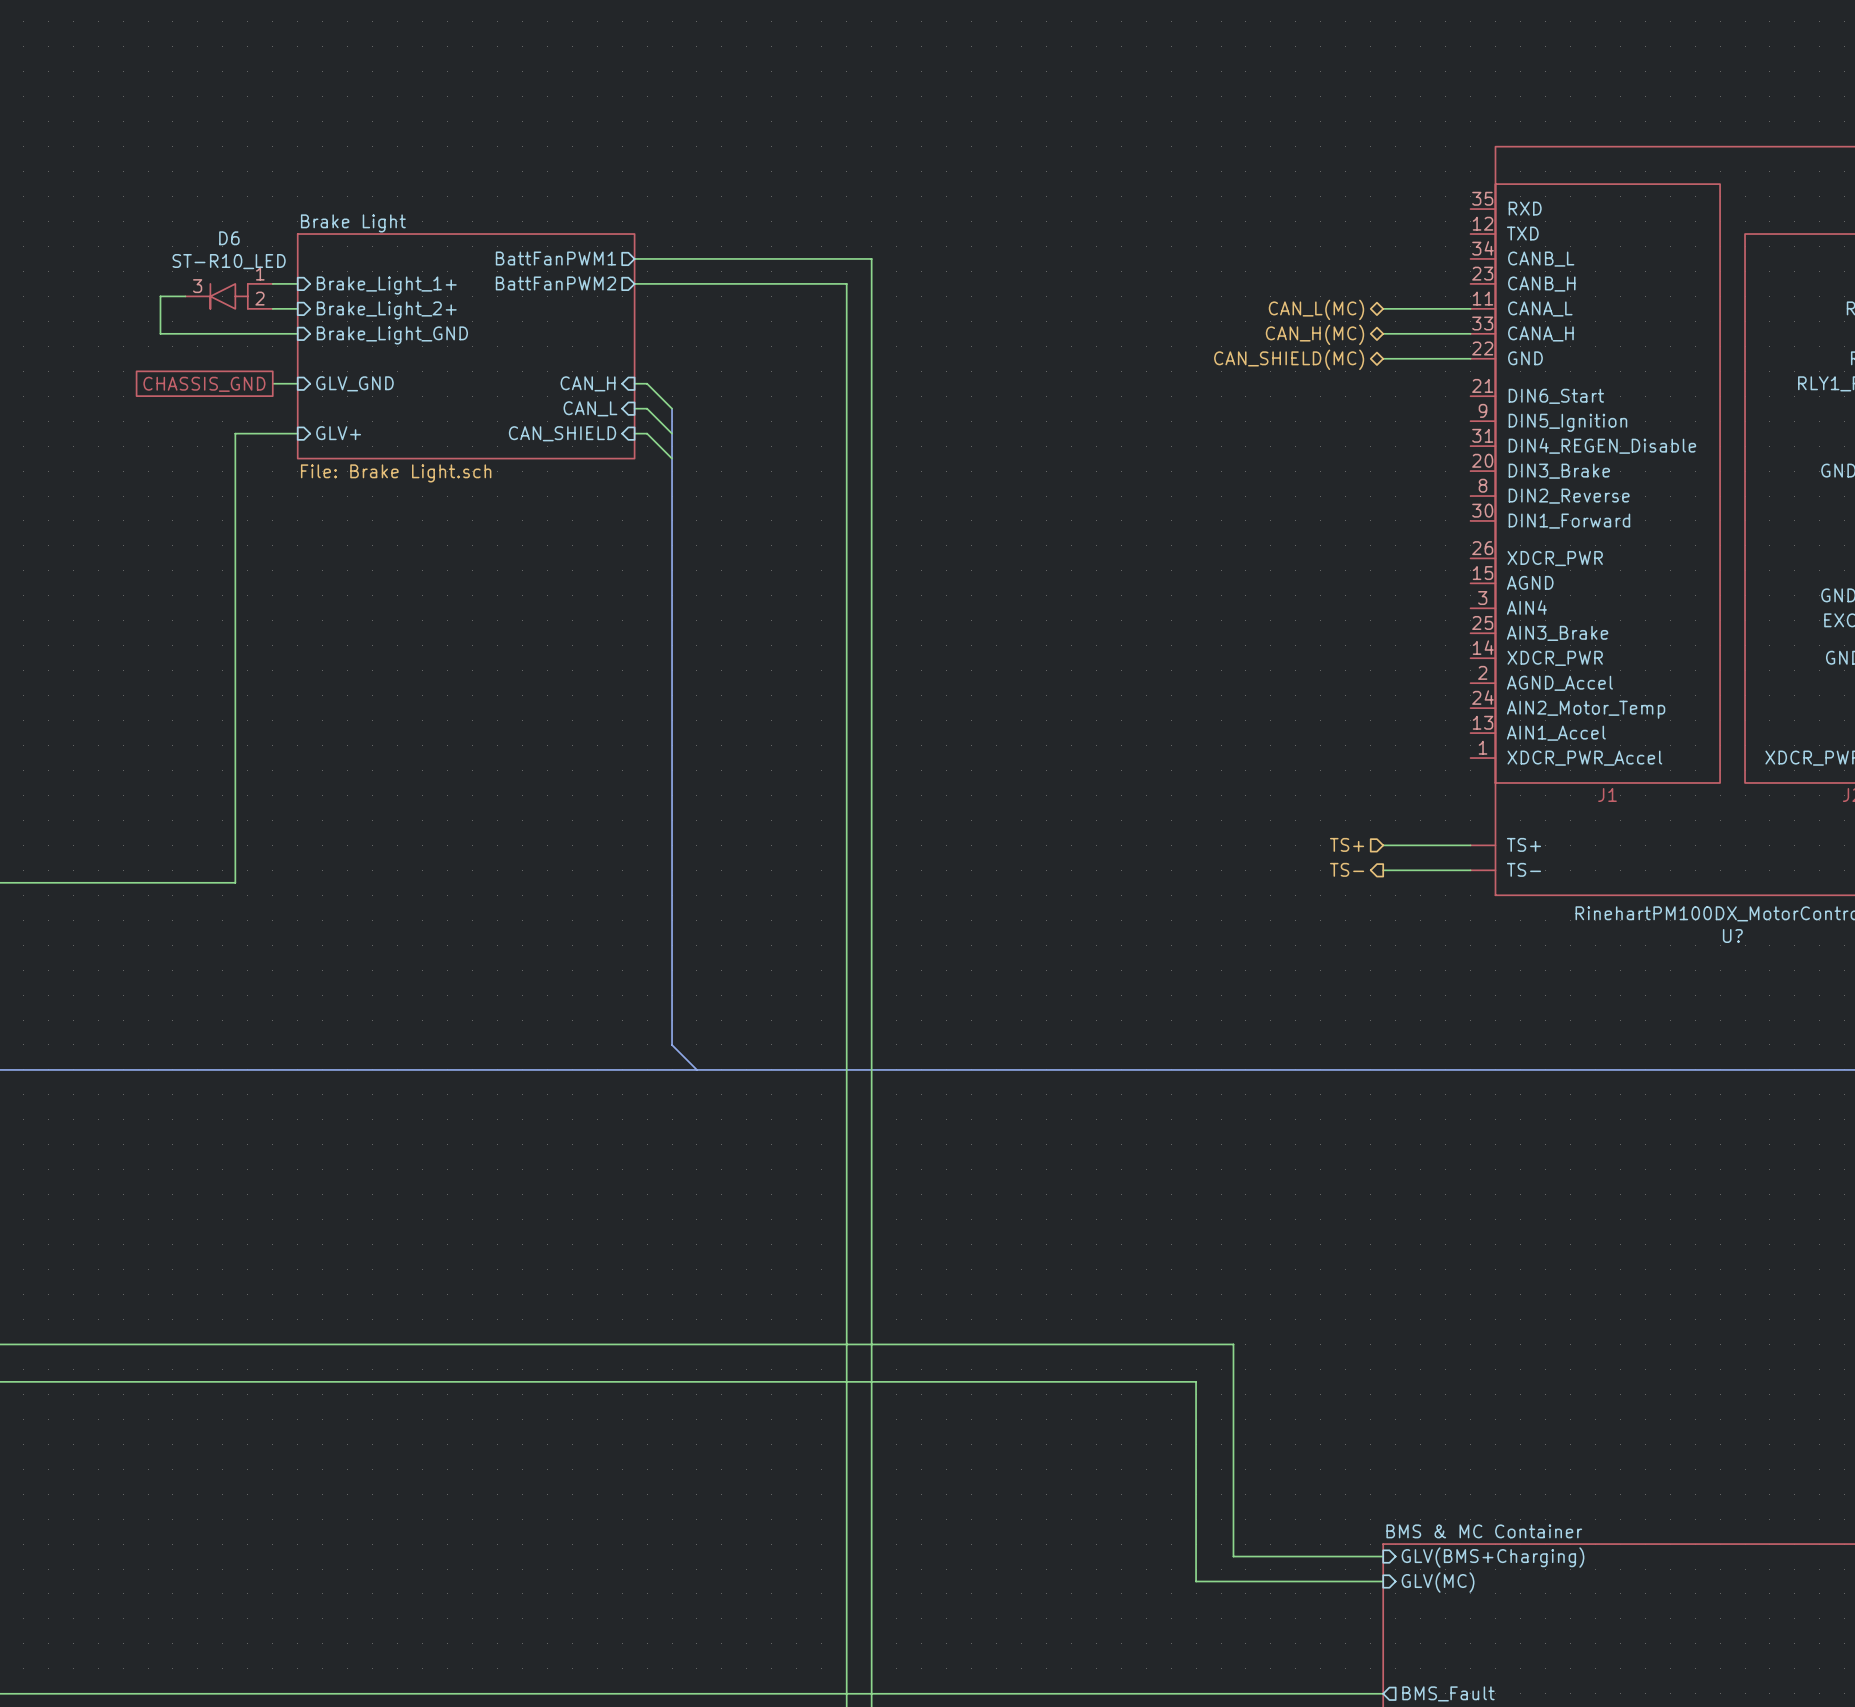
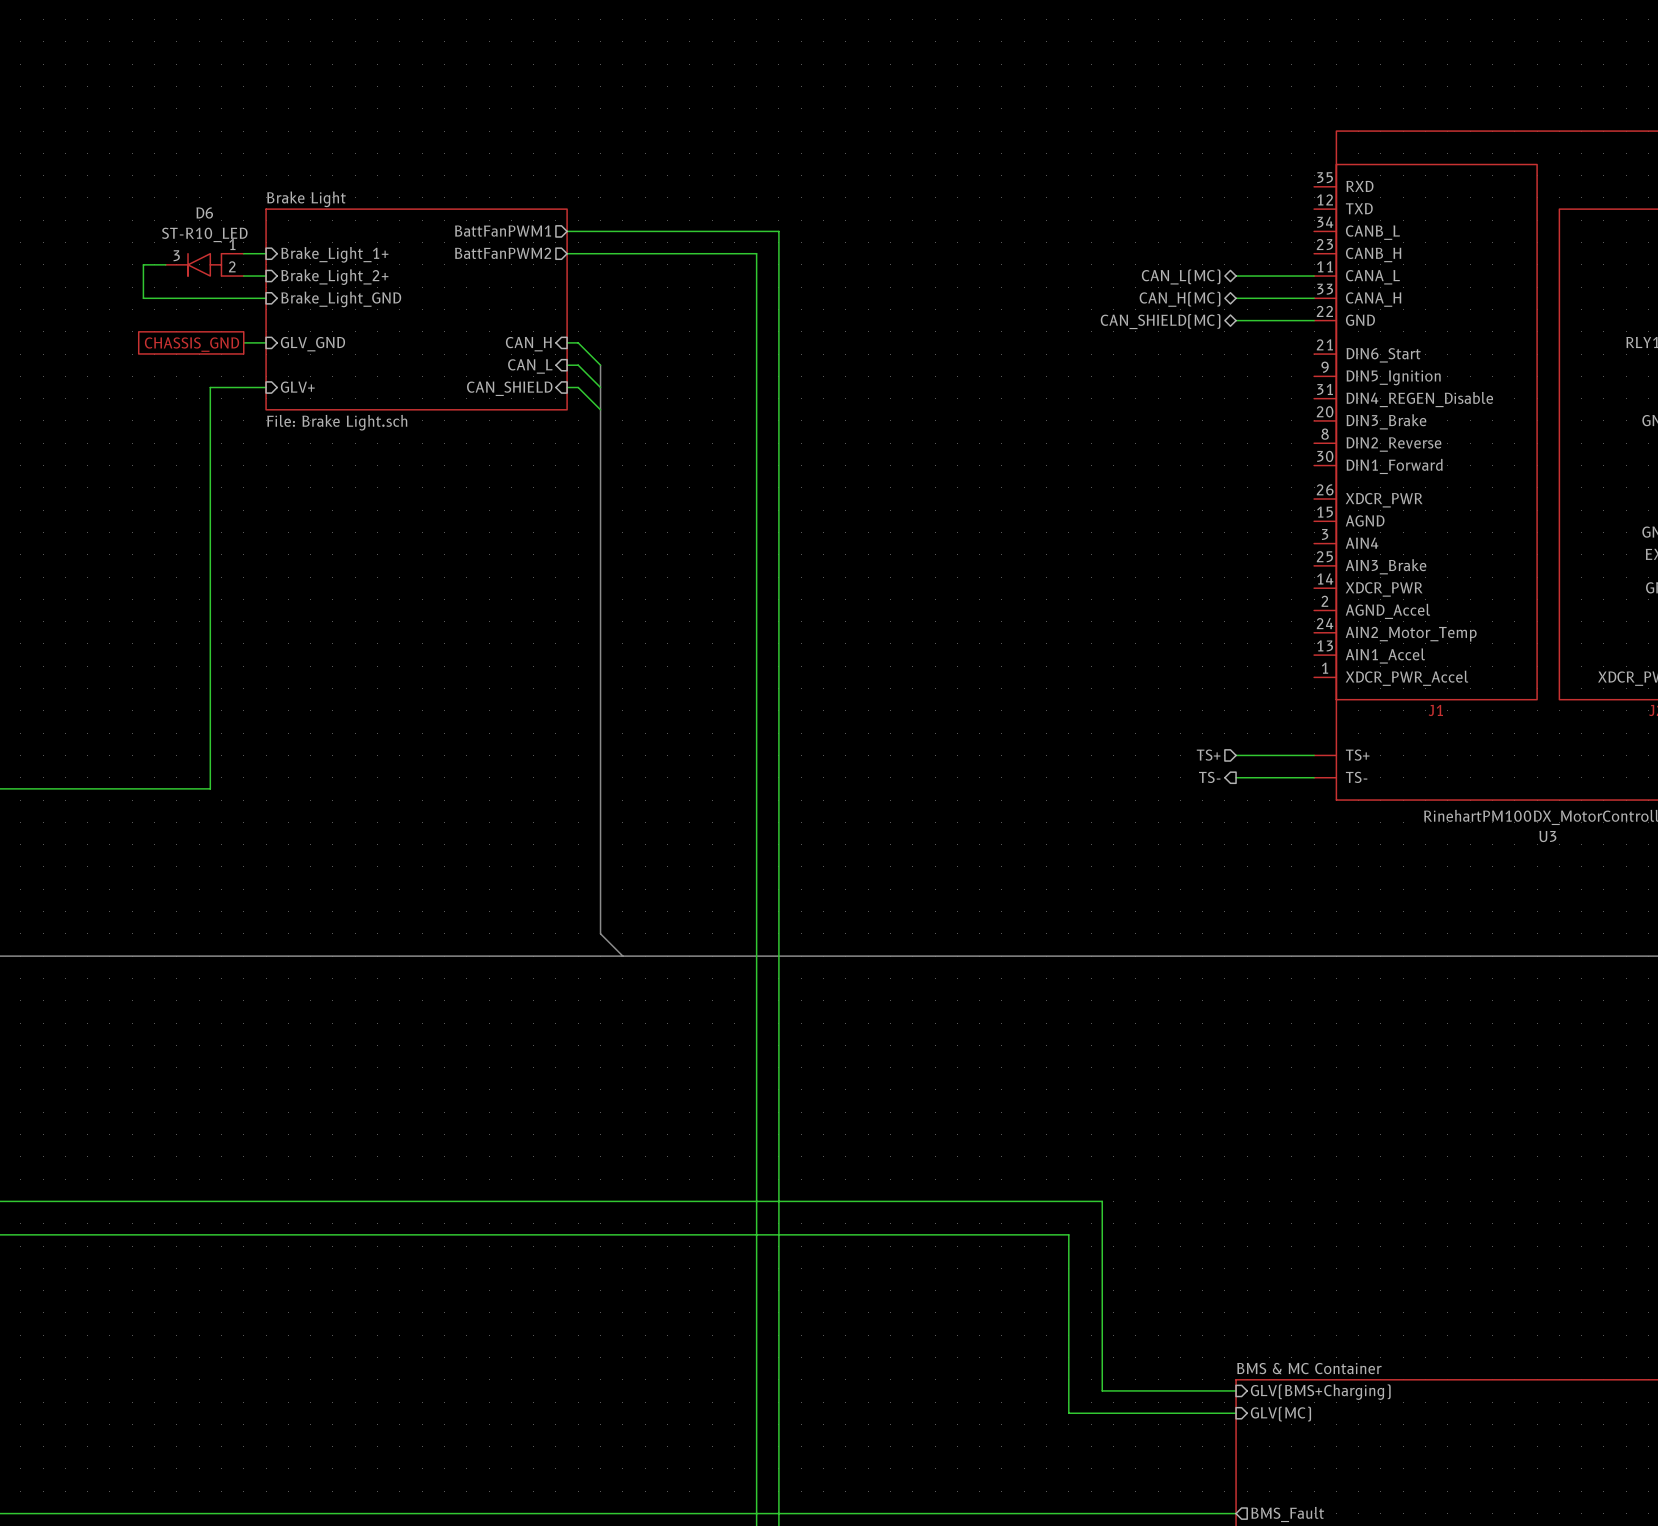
U? name: U? (1732, 935) -> U3 (1547, 836)

